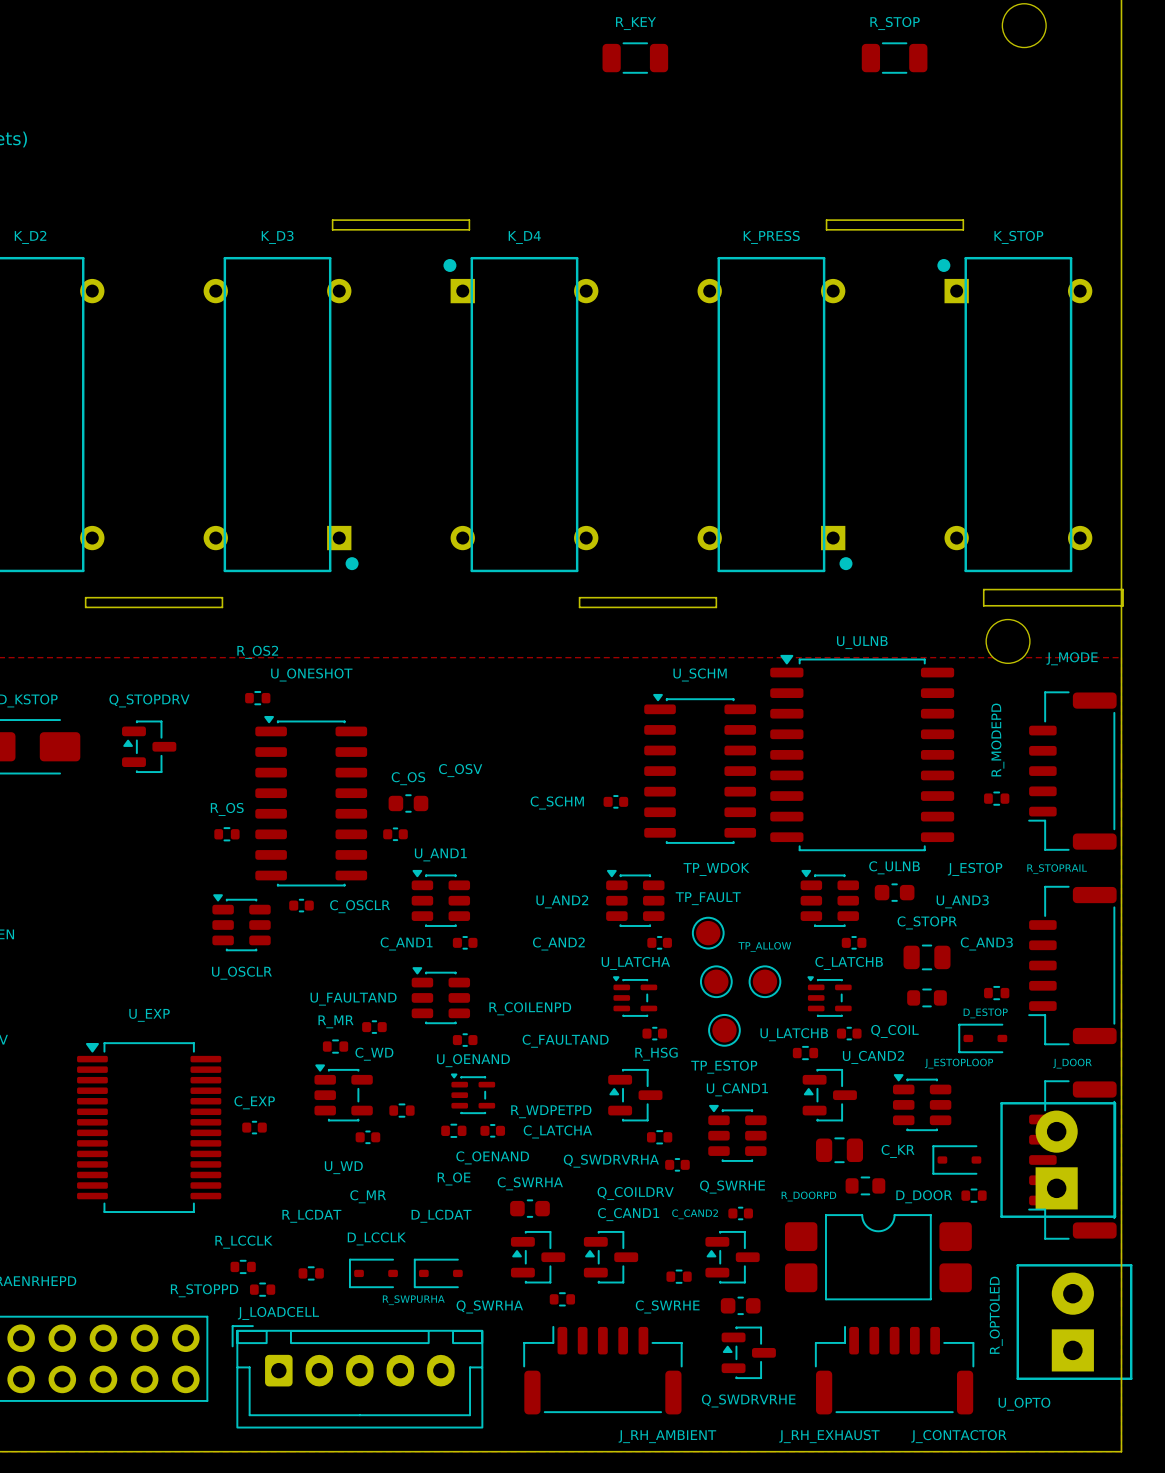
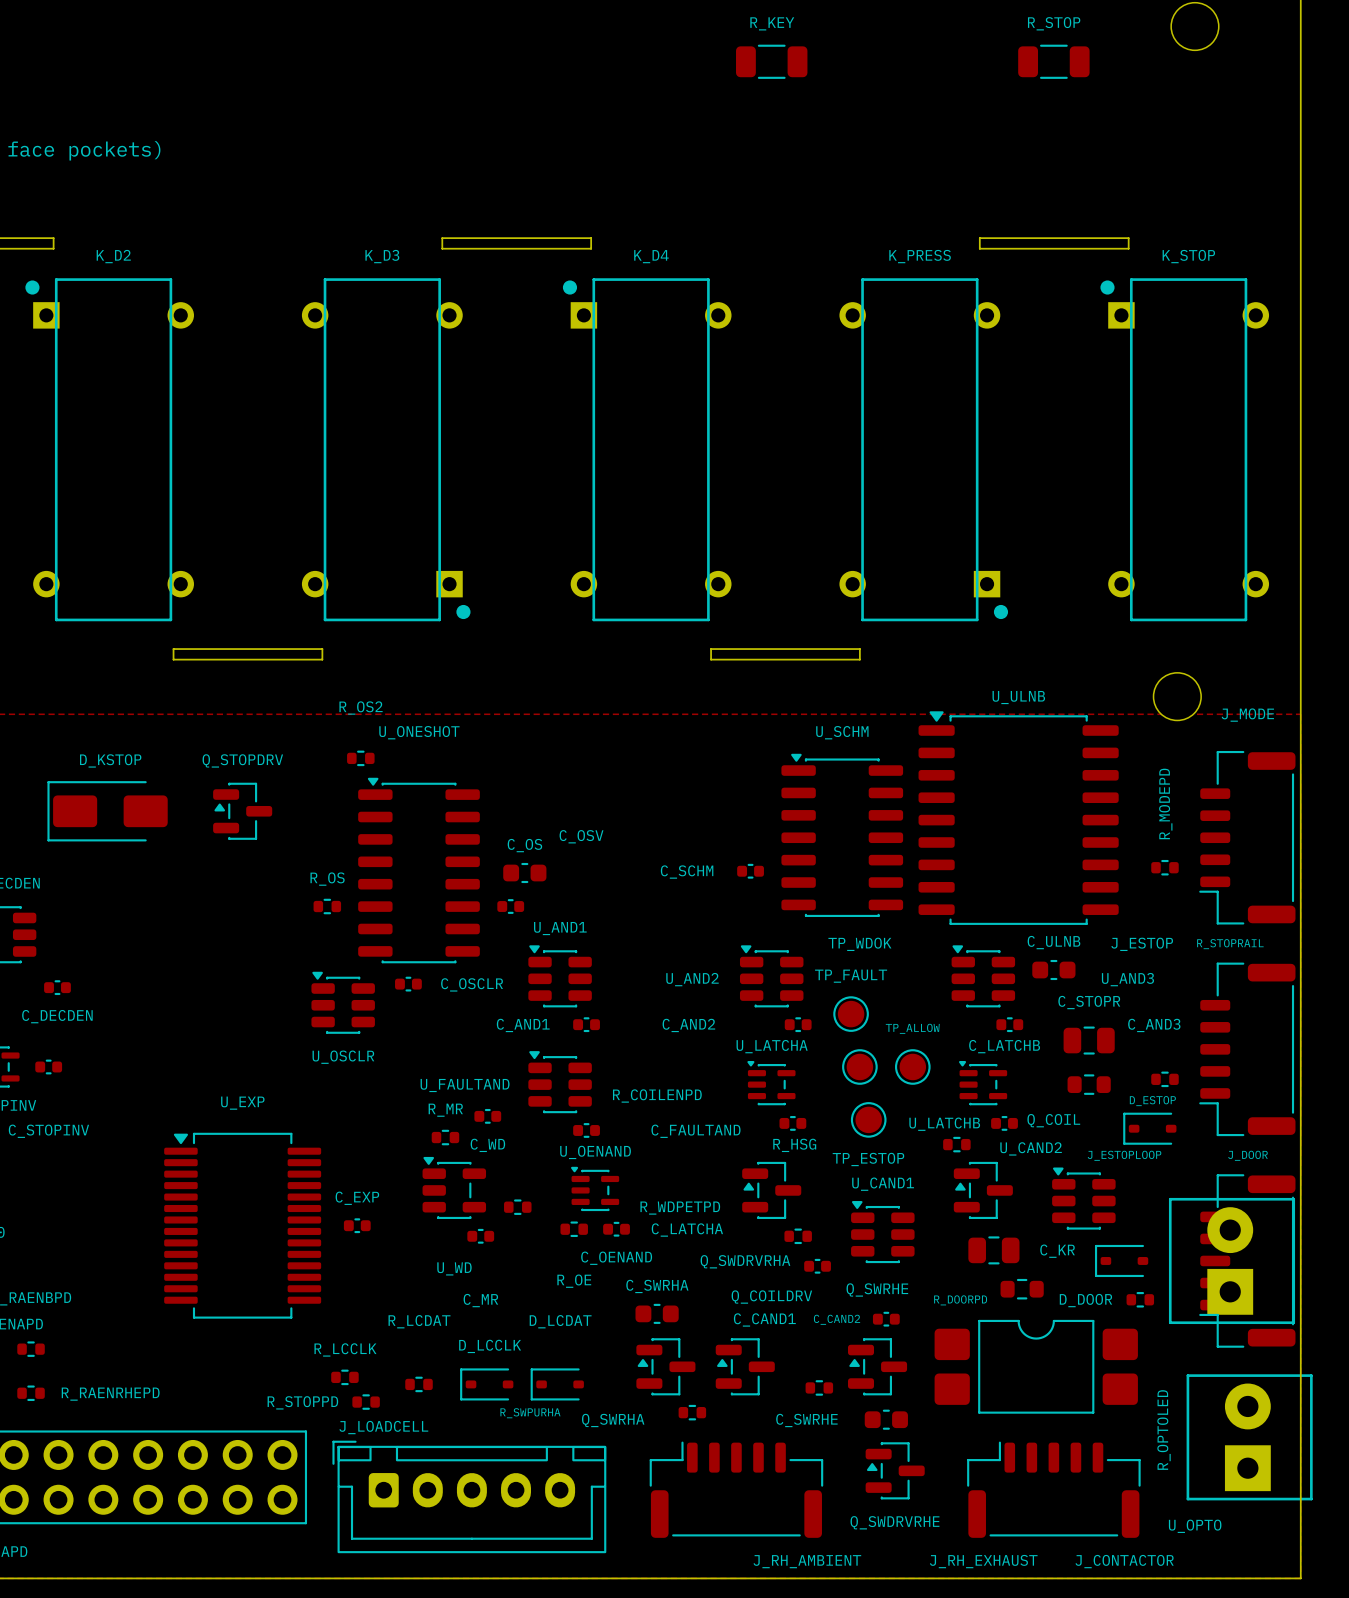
board edge: (983, 589) (1123, 589) (1123, 605) (983, 605) (983, 589) -> none

